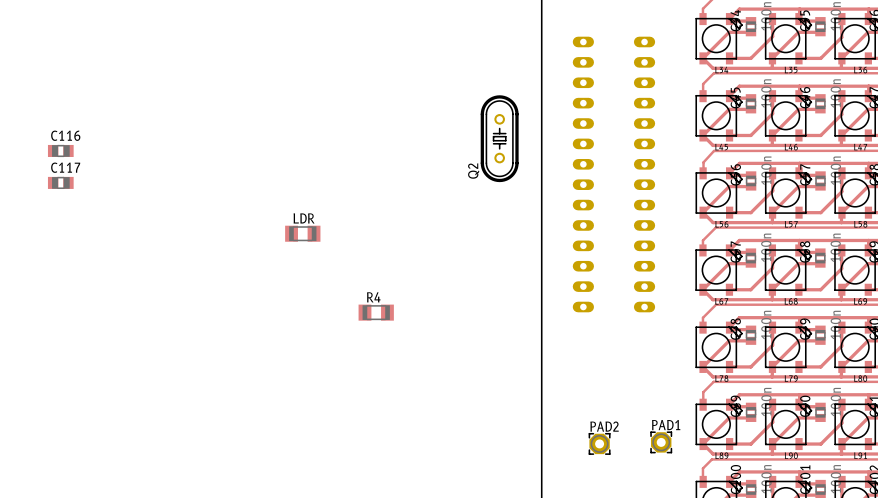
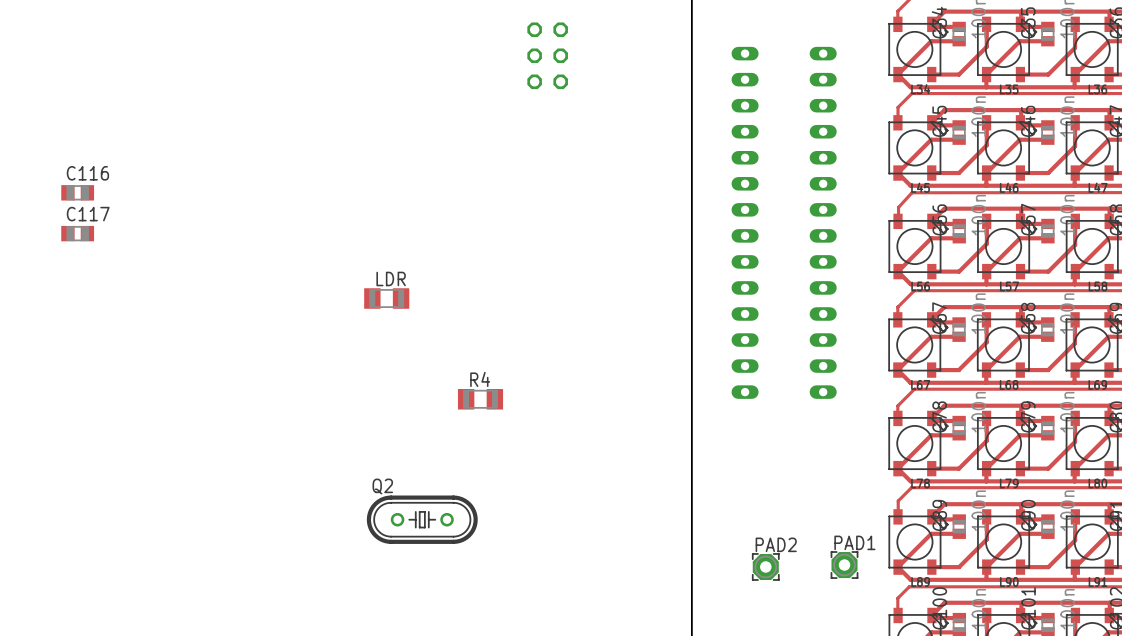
part: none -> (547, 55)
Q2 rotation: 0° (499, 138) -> 90° clockwise (422, 519)
Q2 position: (499, 138) -> (422, 519)

